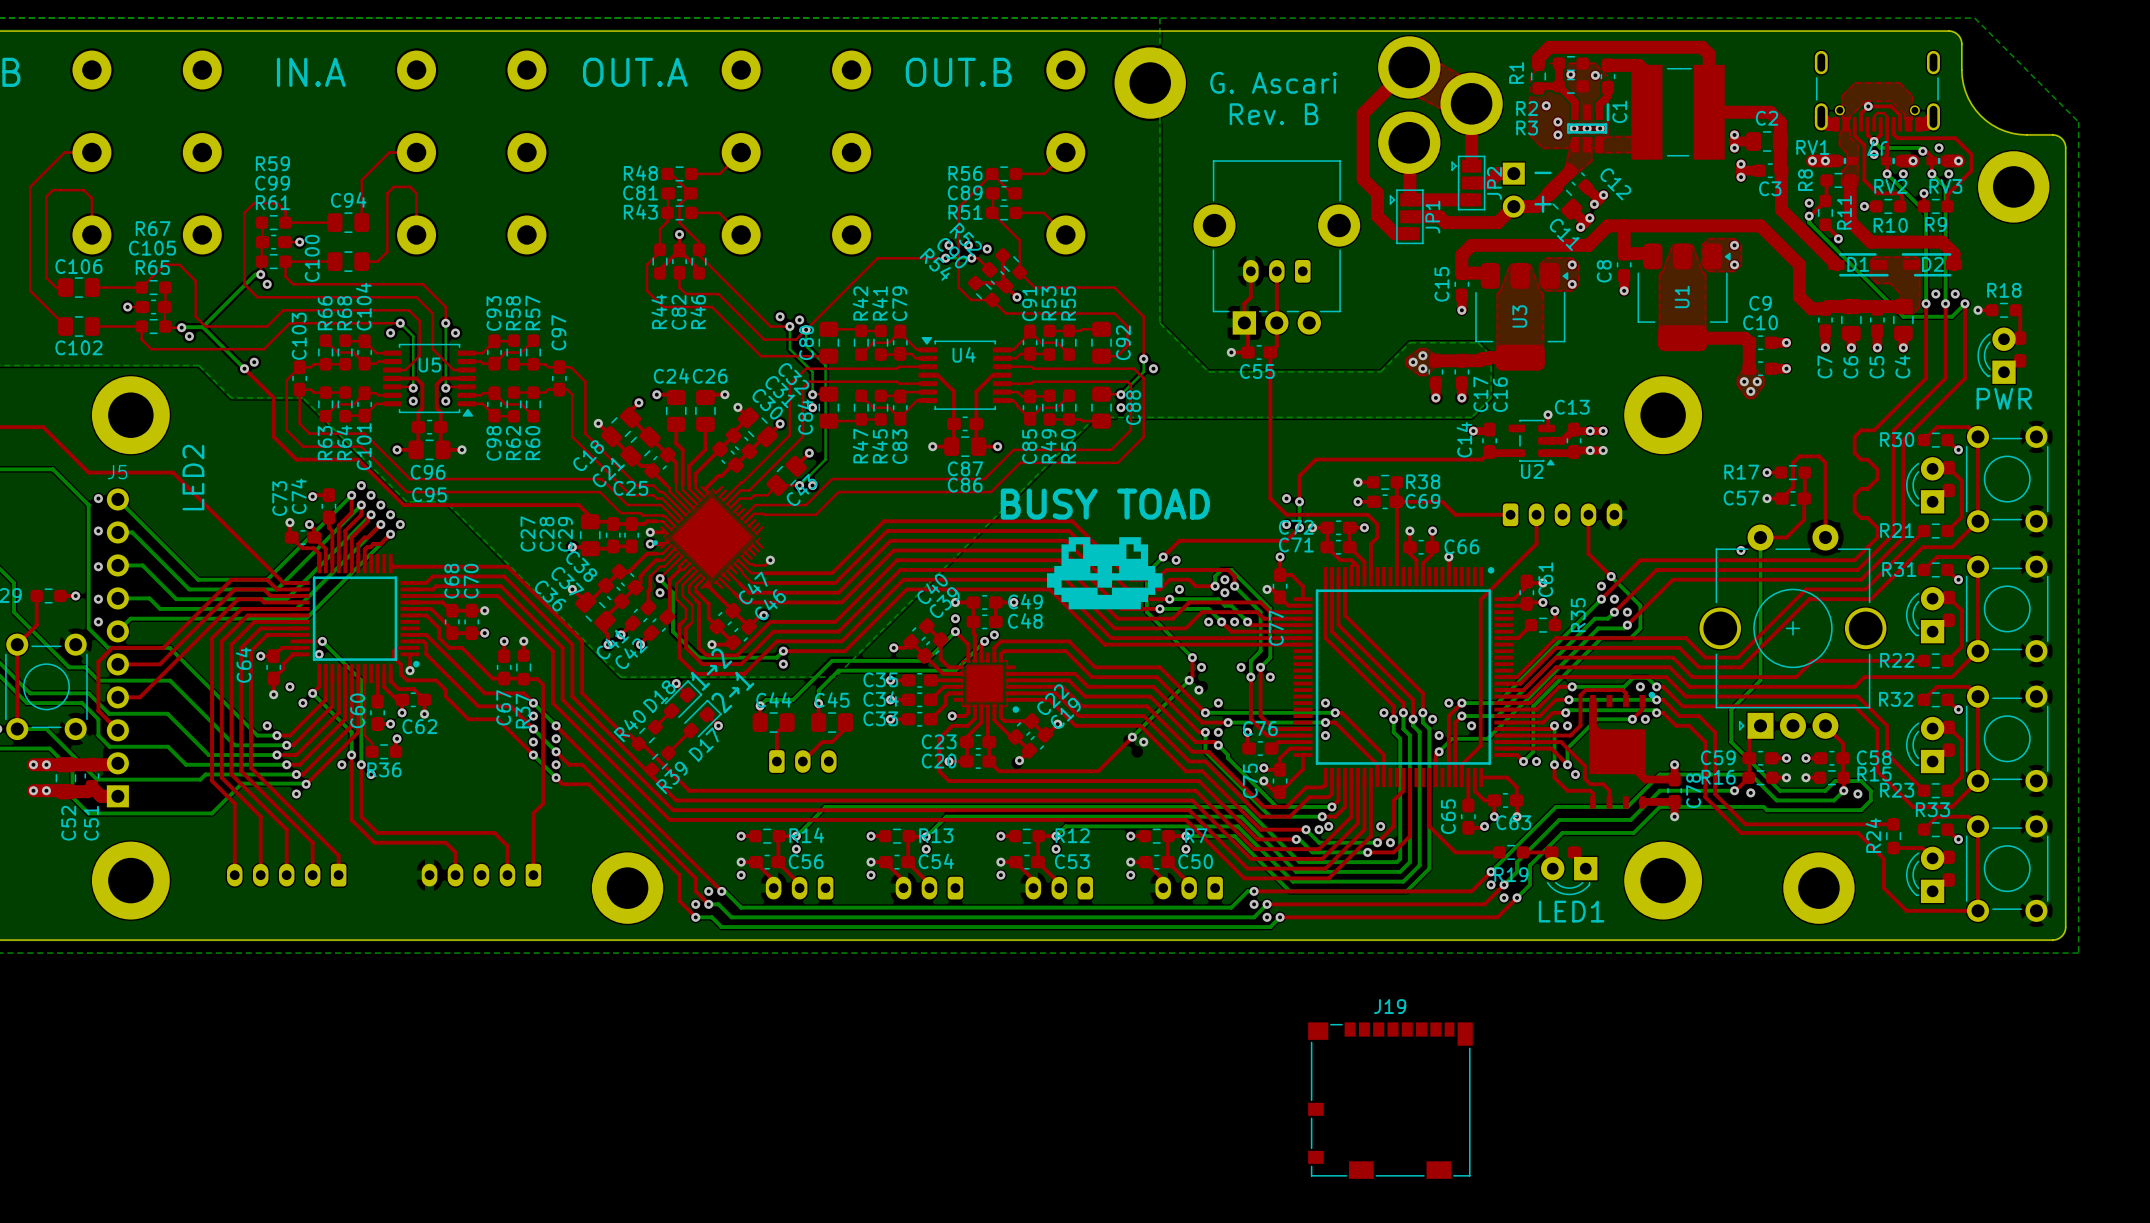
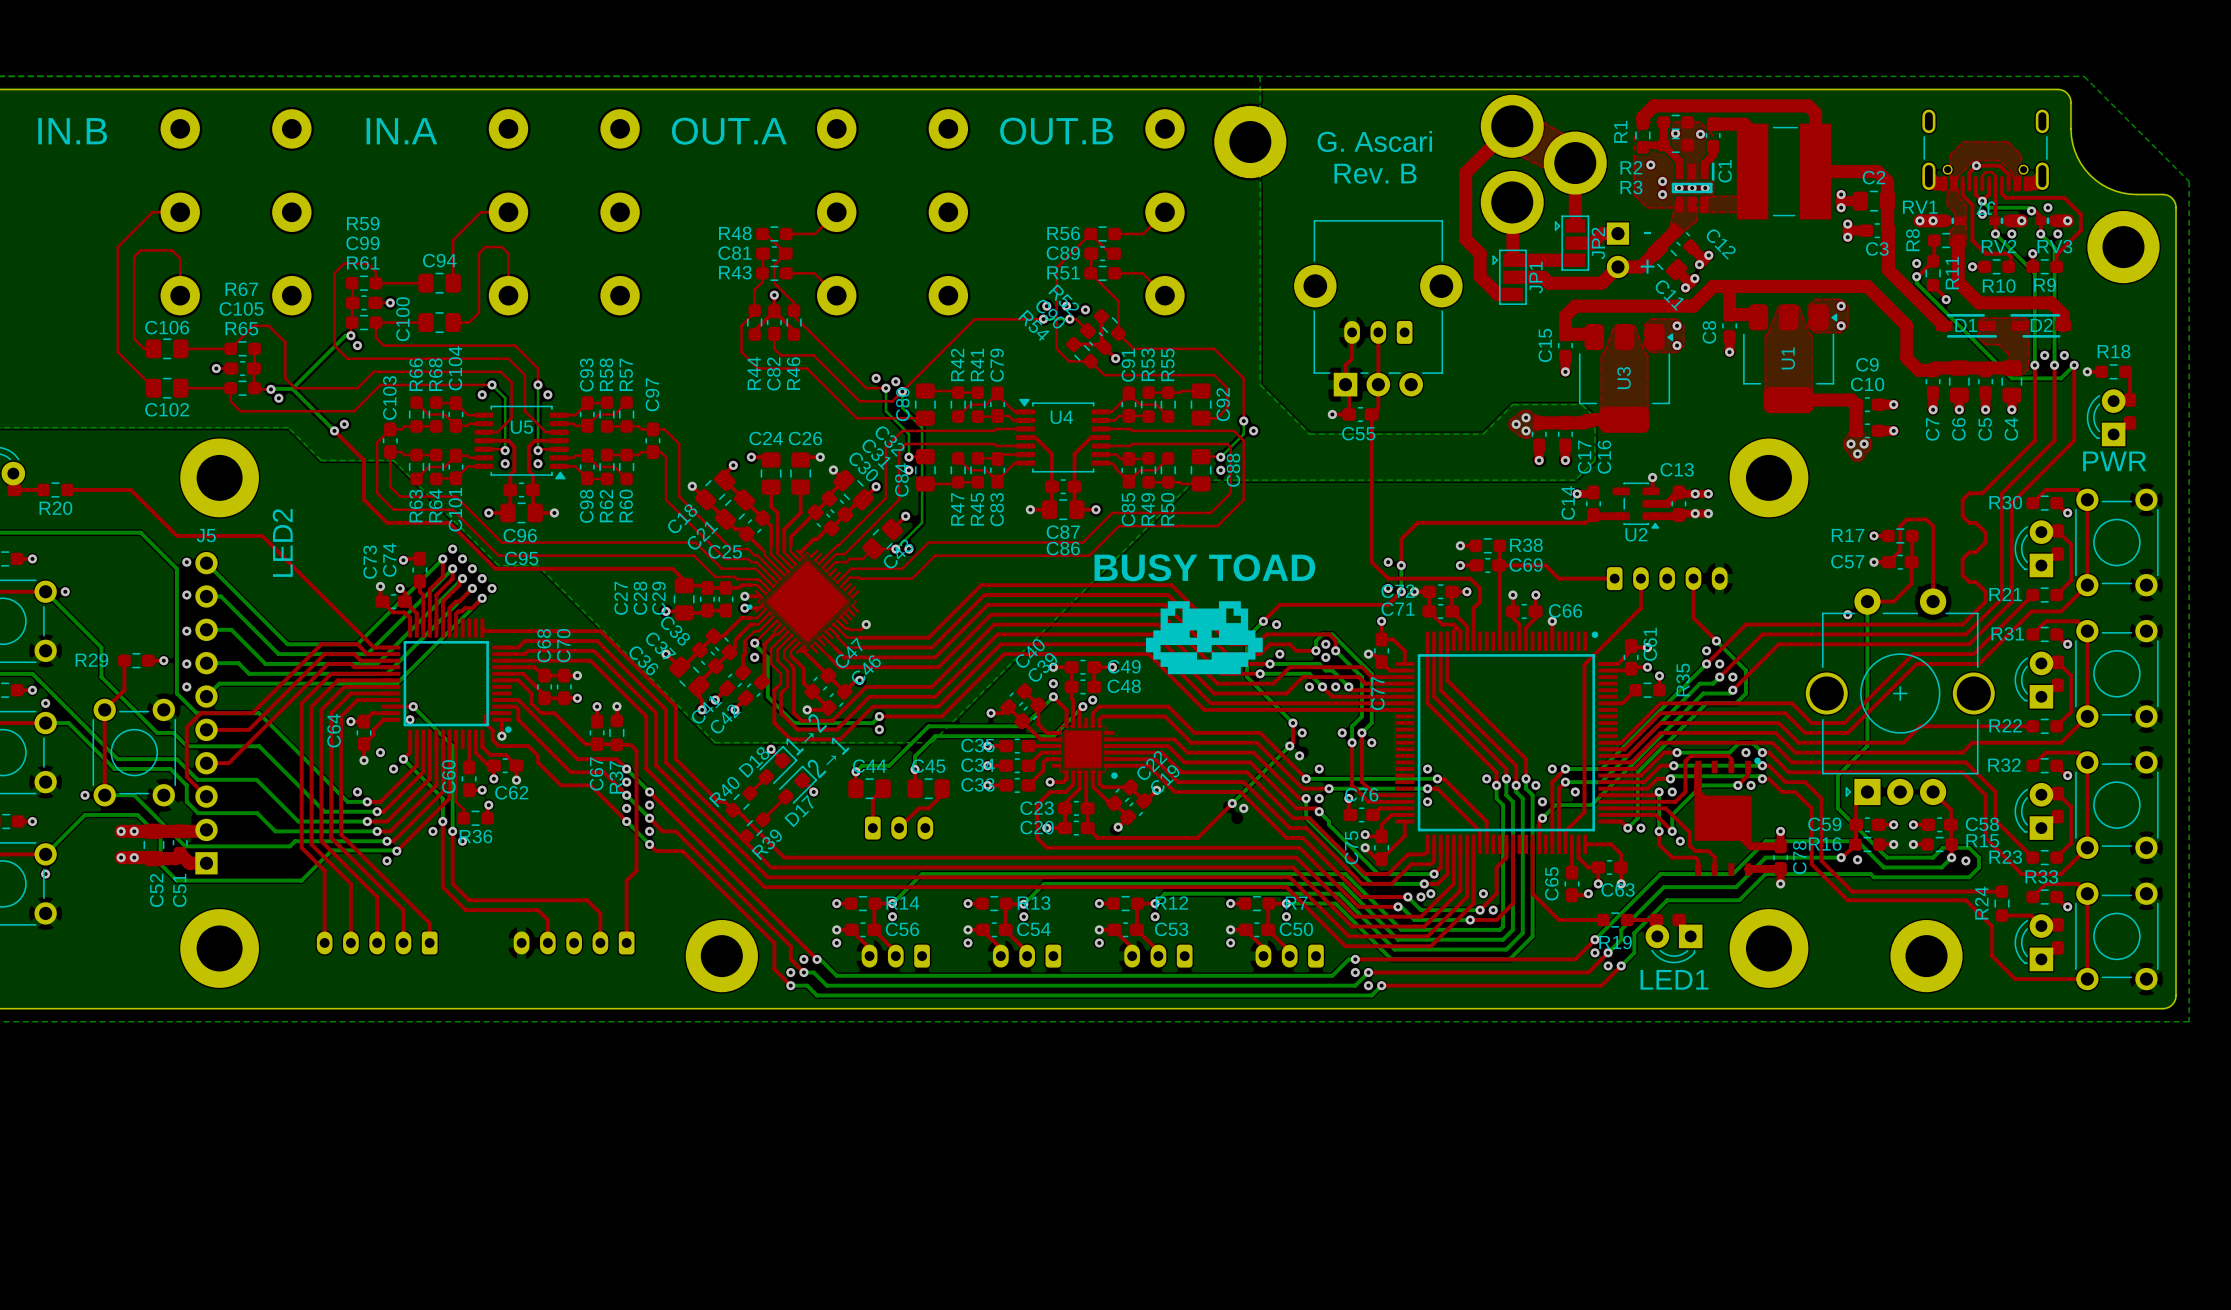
J19: (1390, 1100) -> none

